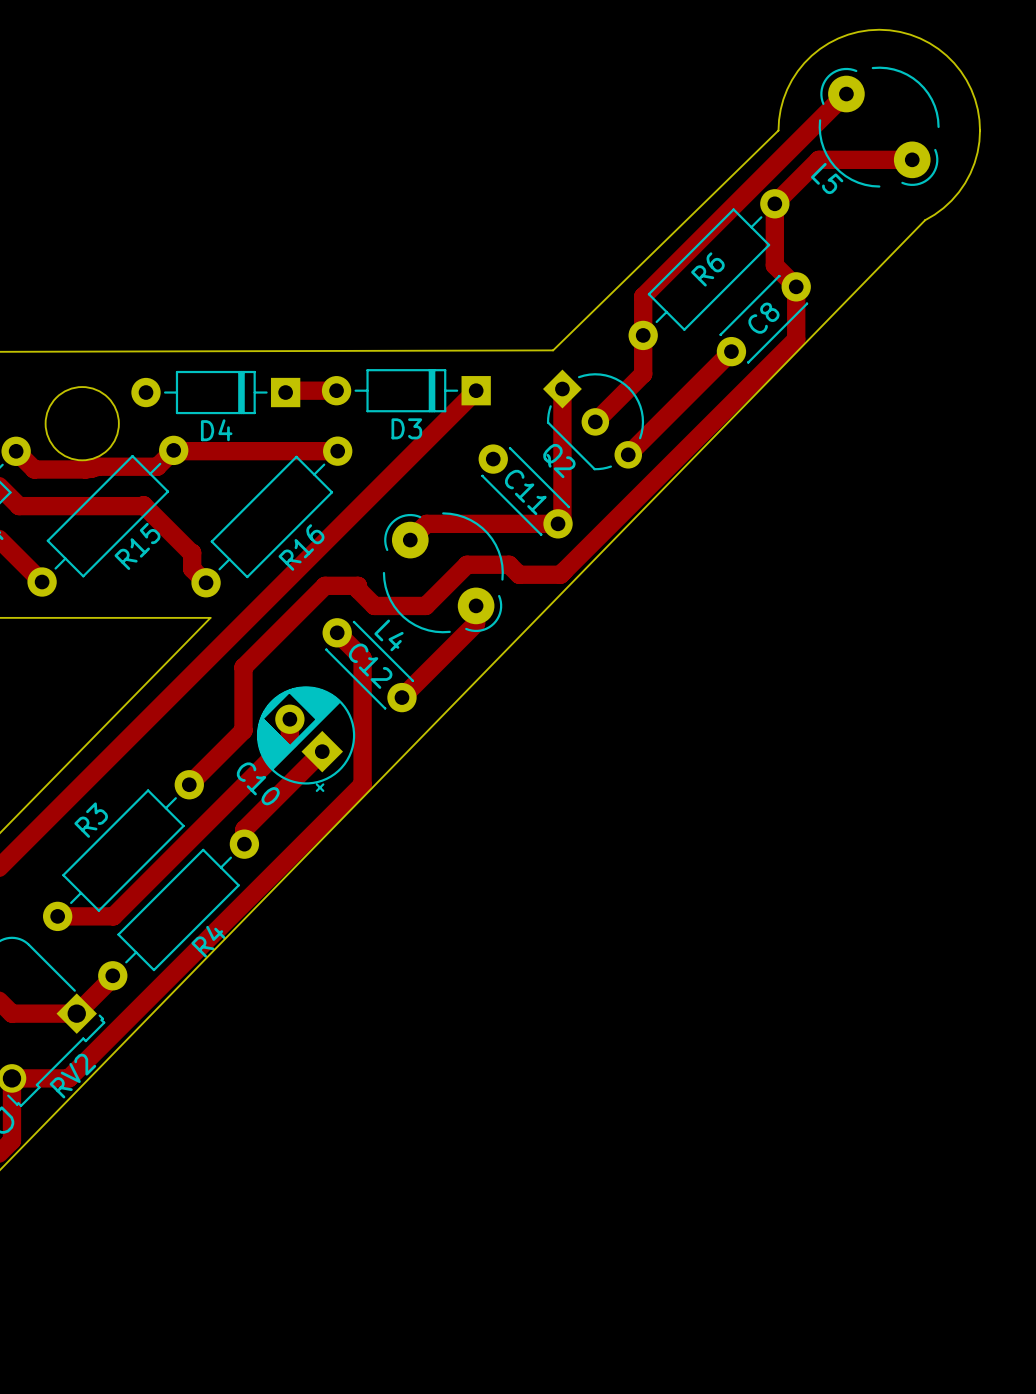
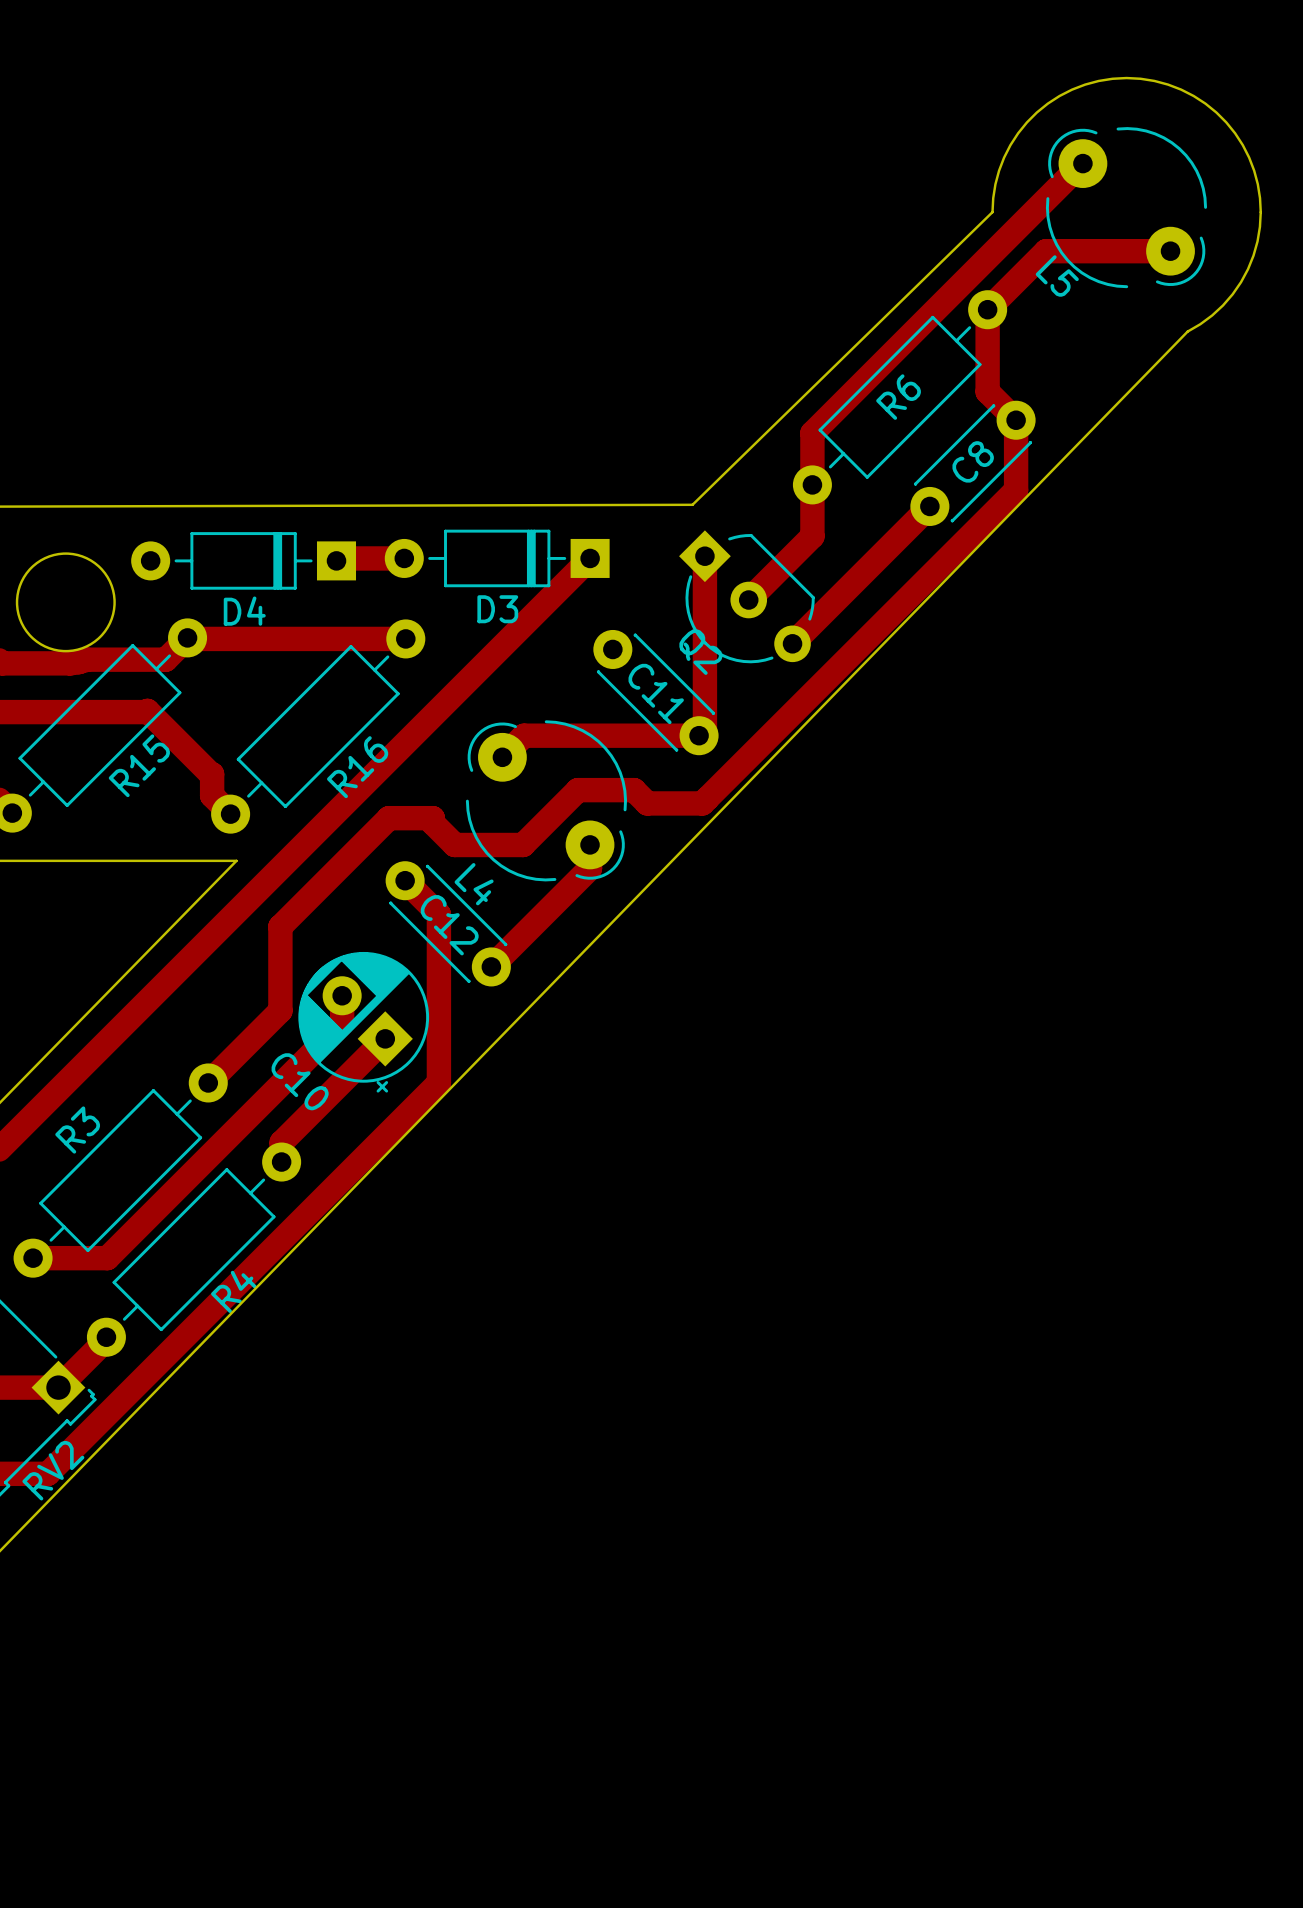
Q2 footprint: [543, 369, 645, 471] -> [679, 530, 815, 664]

